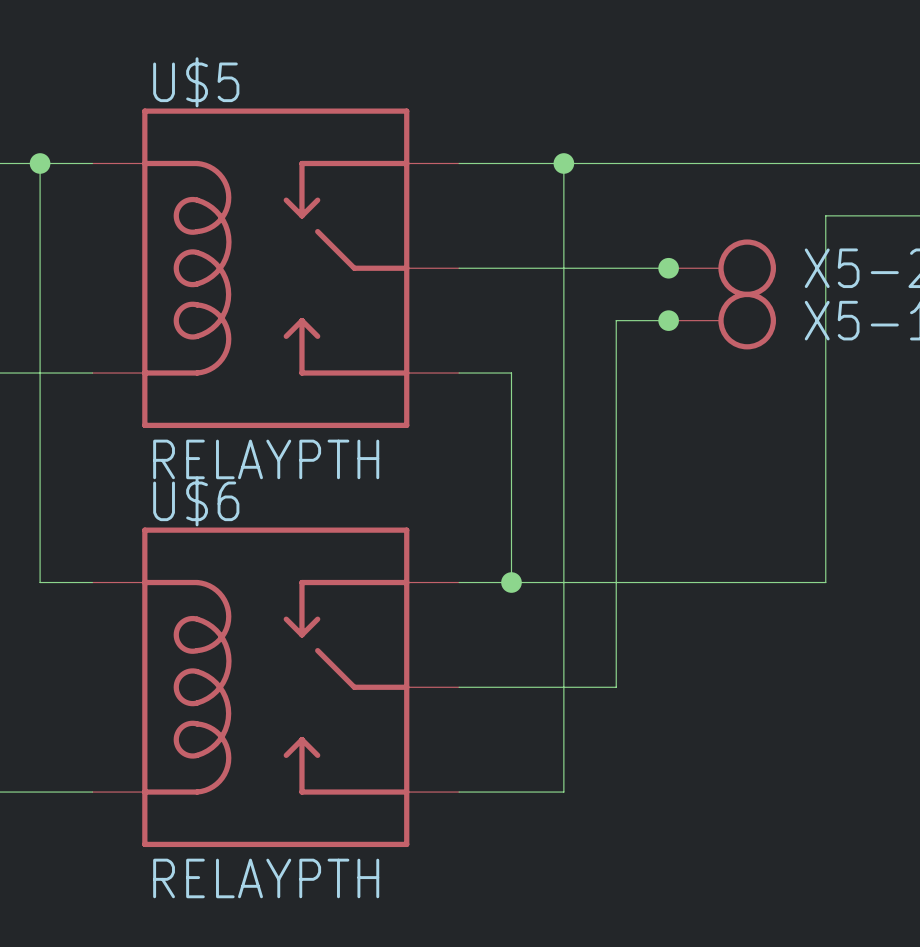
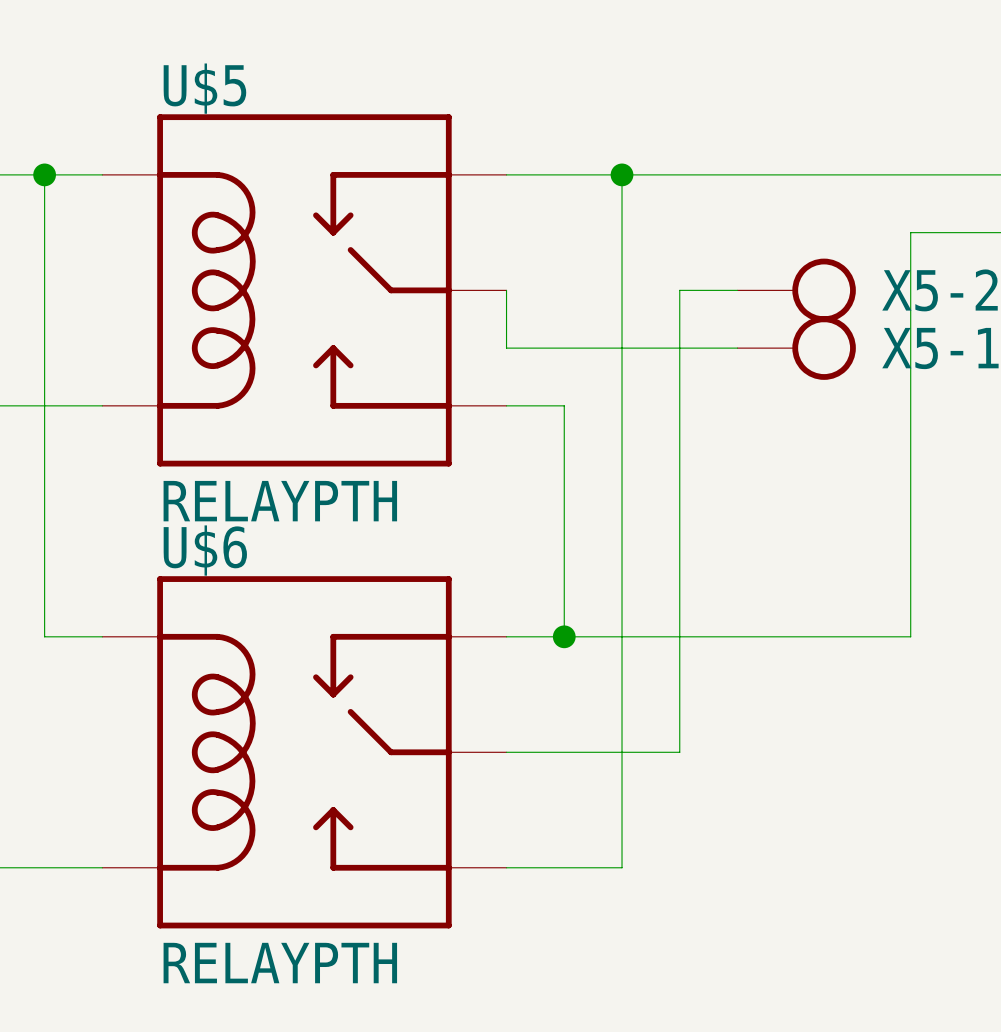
wire: (459, 268) (616, 268) -> (506, 290) (506, 348) (679, 348) (679, 290)
junction: (668, 268) -> none
junction: (668, 320) -> none

